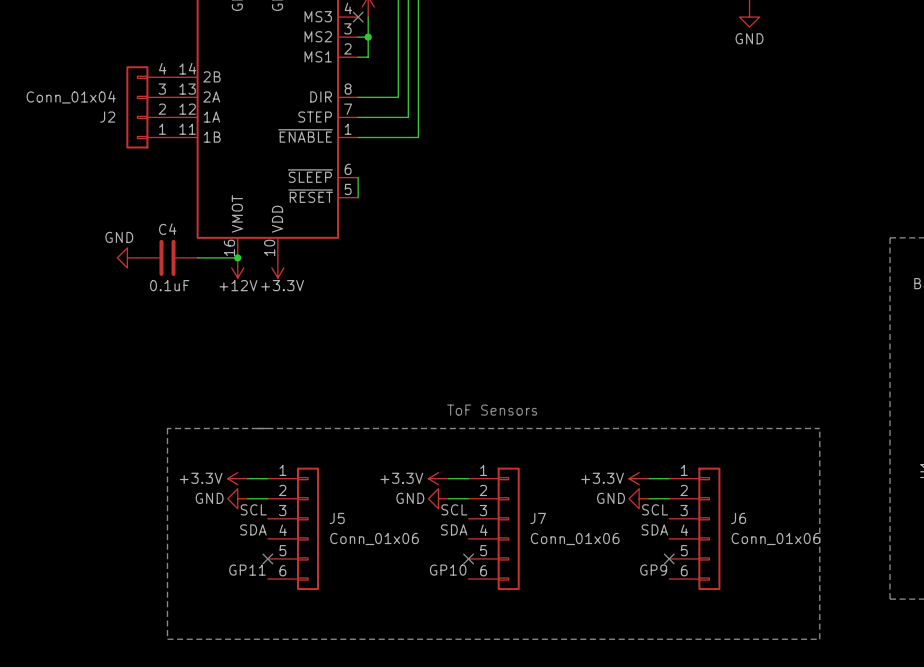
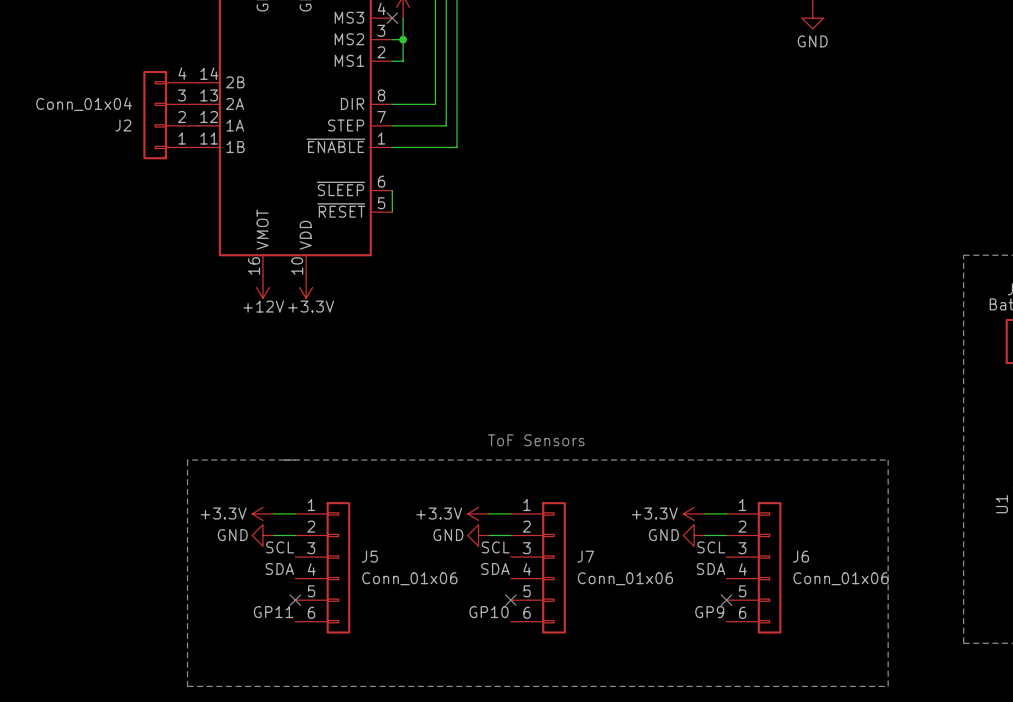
power symbol: GND (127, 257) -> none
C4: 0.1uF (167, 257) -> none
wire: (197, 257) (237, 257) -> none
junction: (237, 257) -> none

